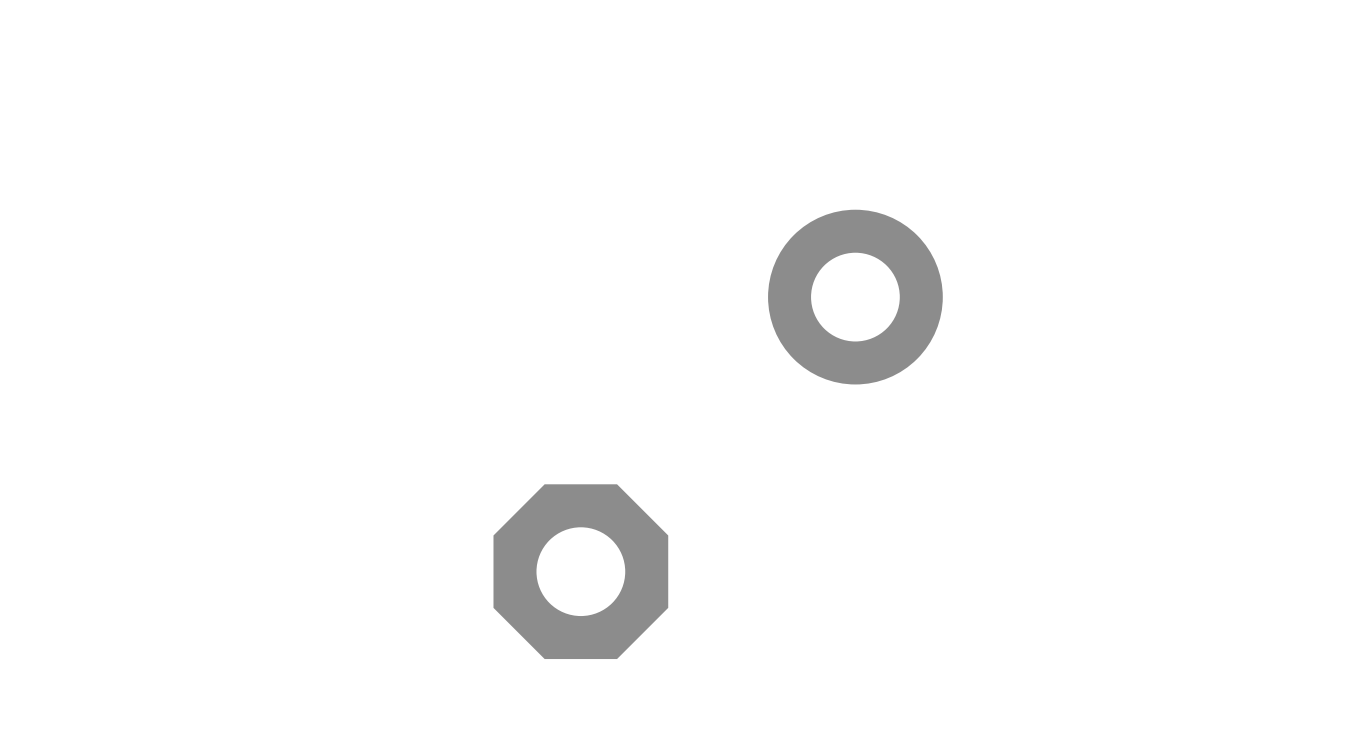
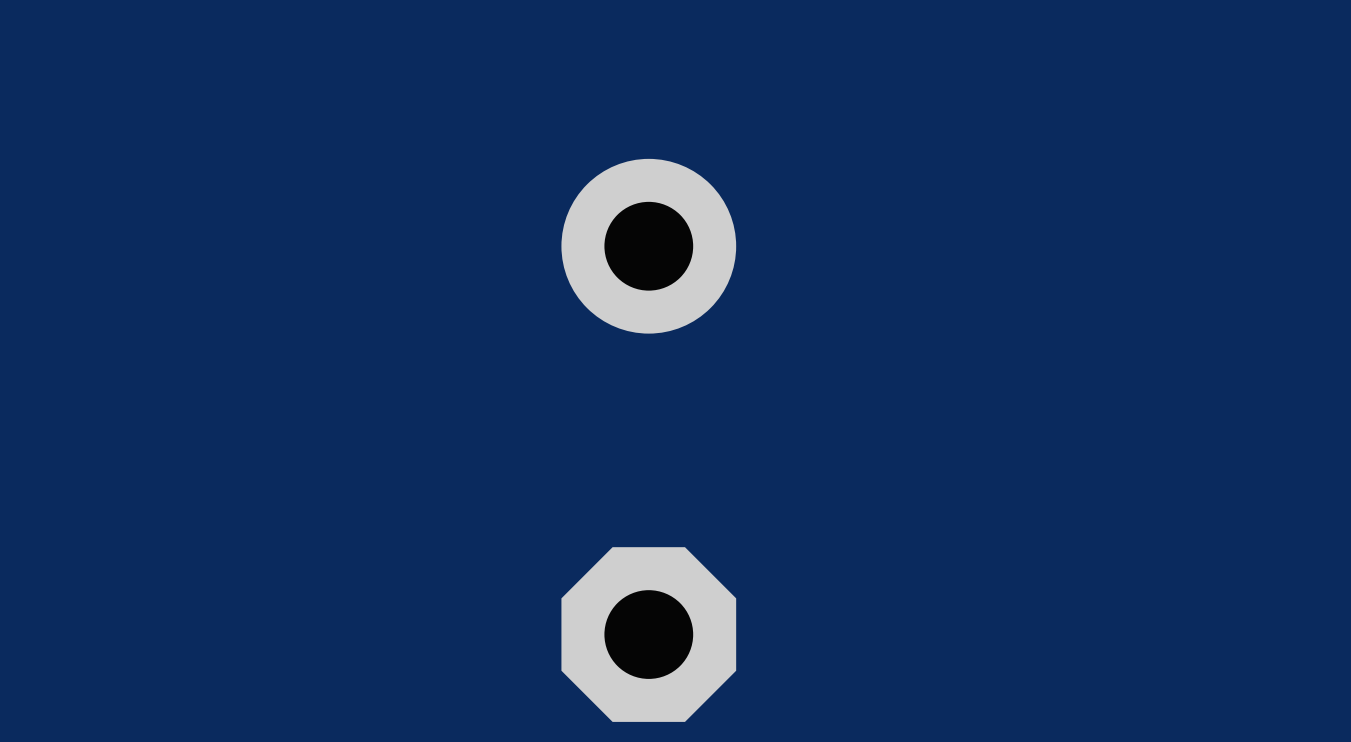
part rotation: 0° (718, 434) -> 45° counterclockwise (648, 440)

